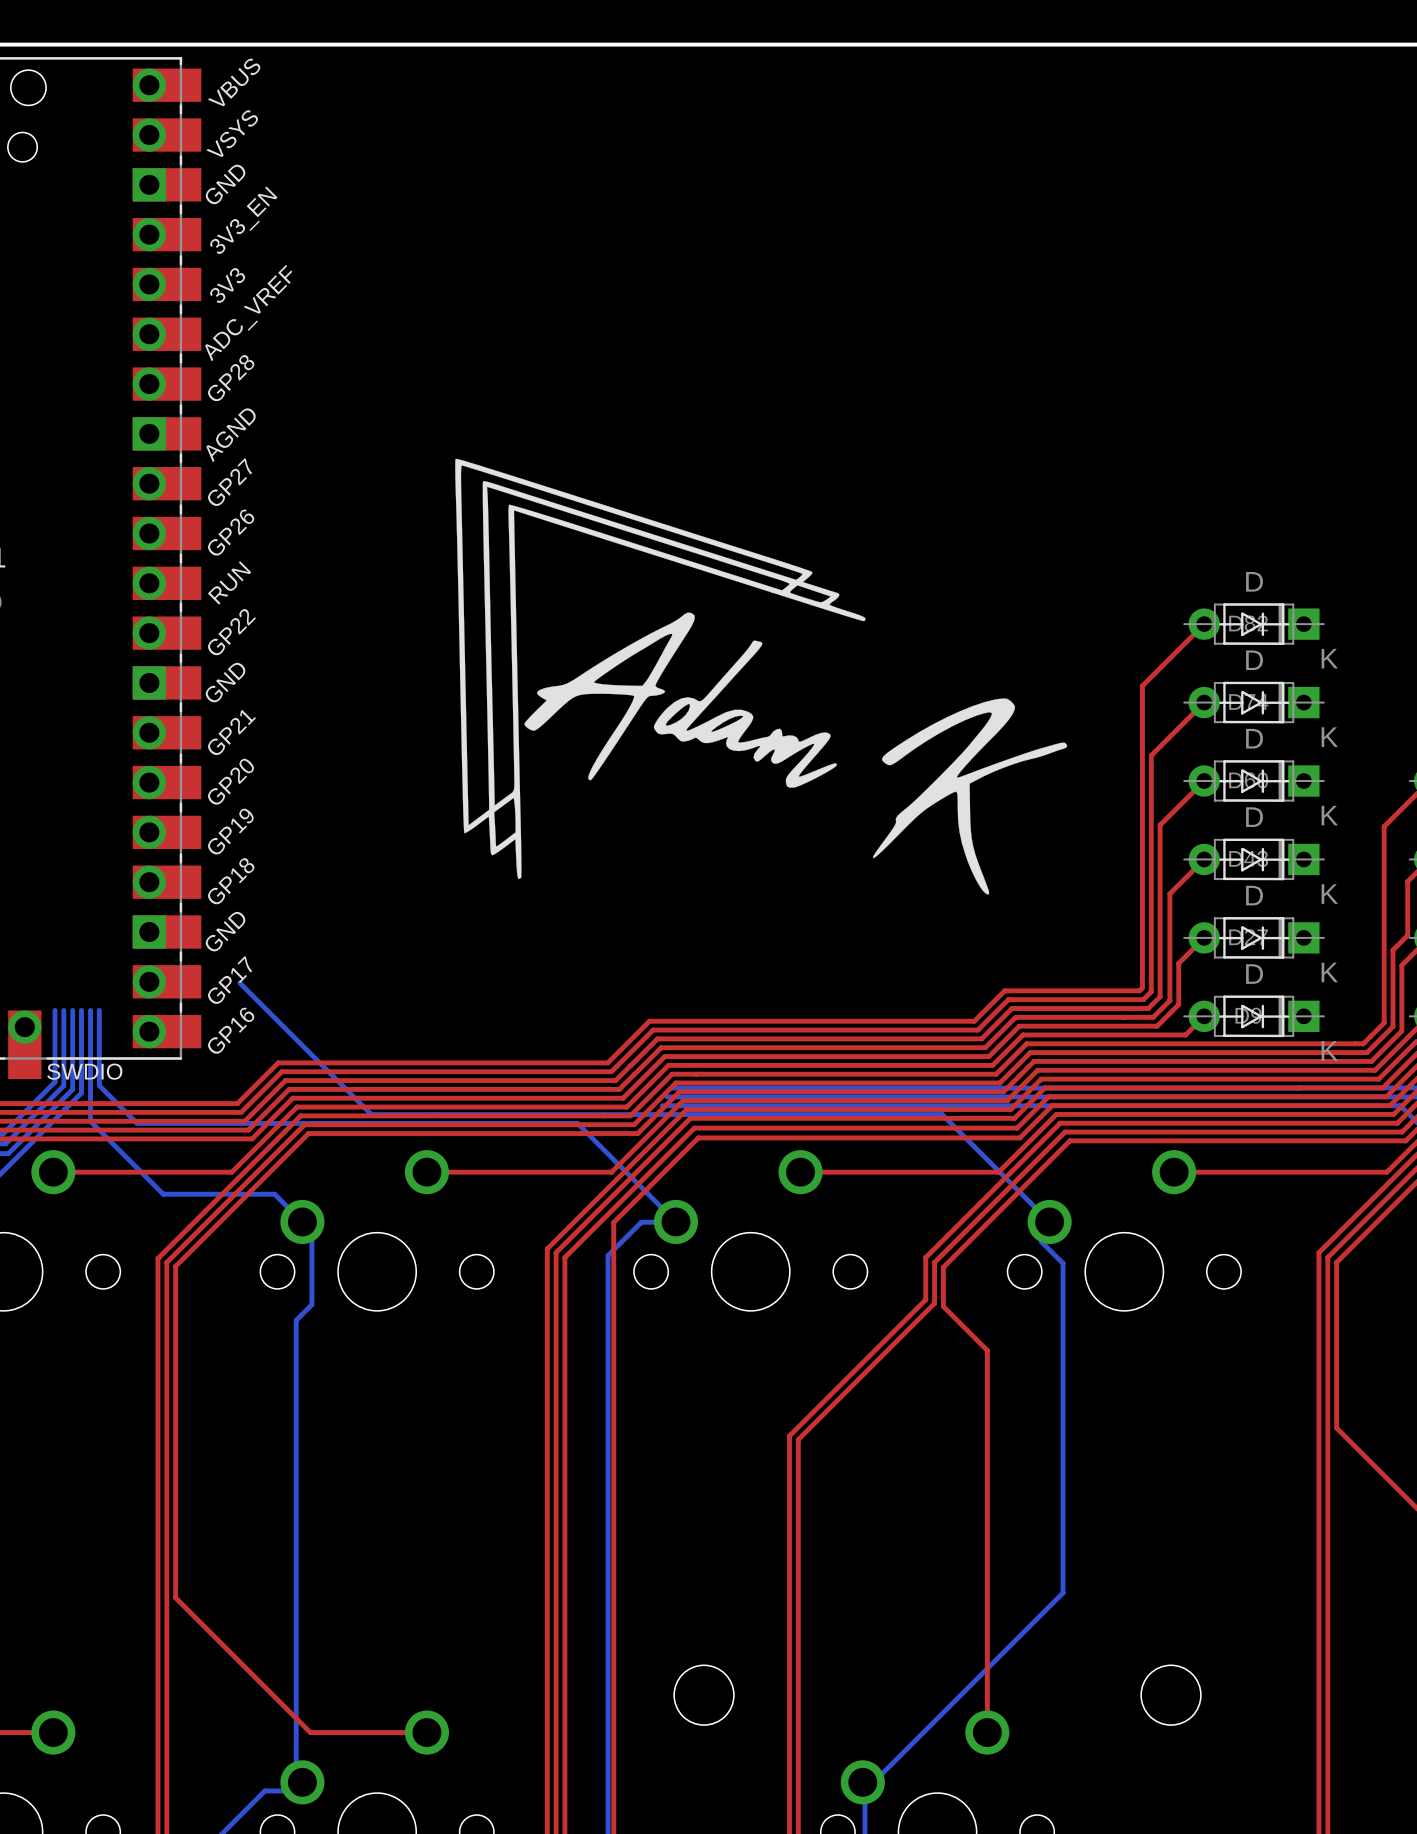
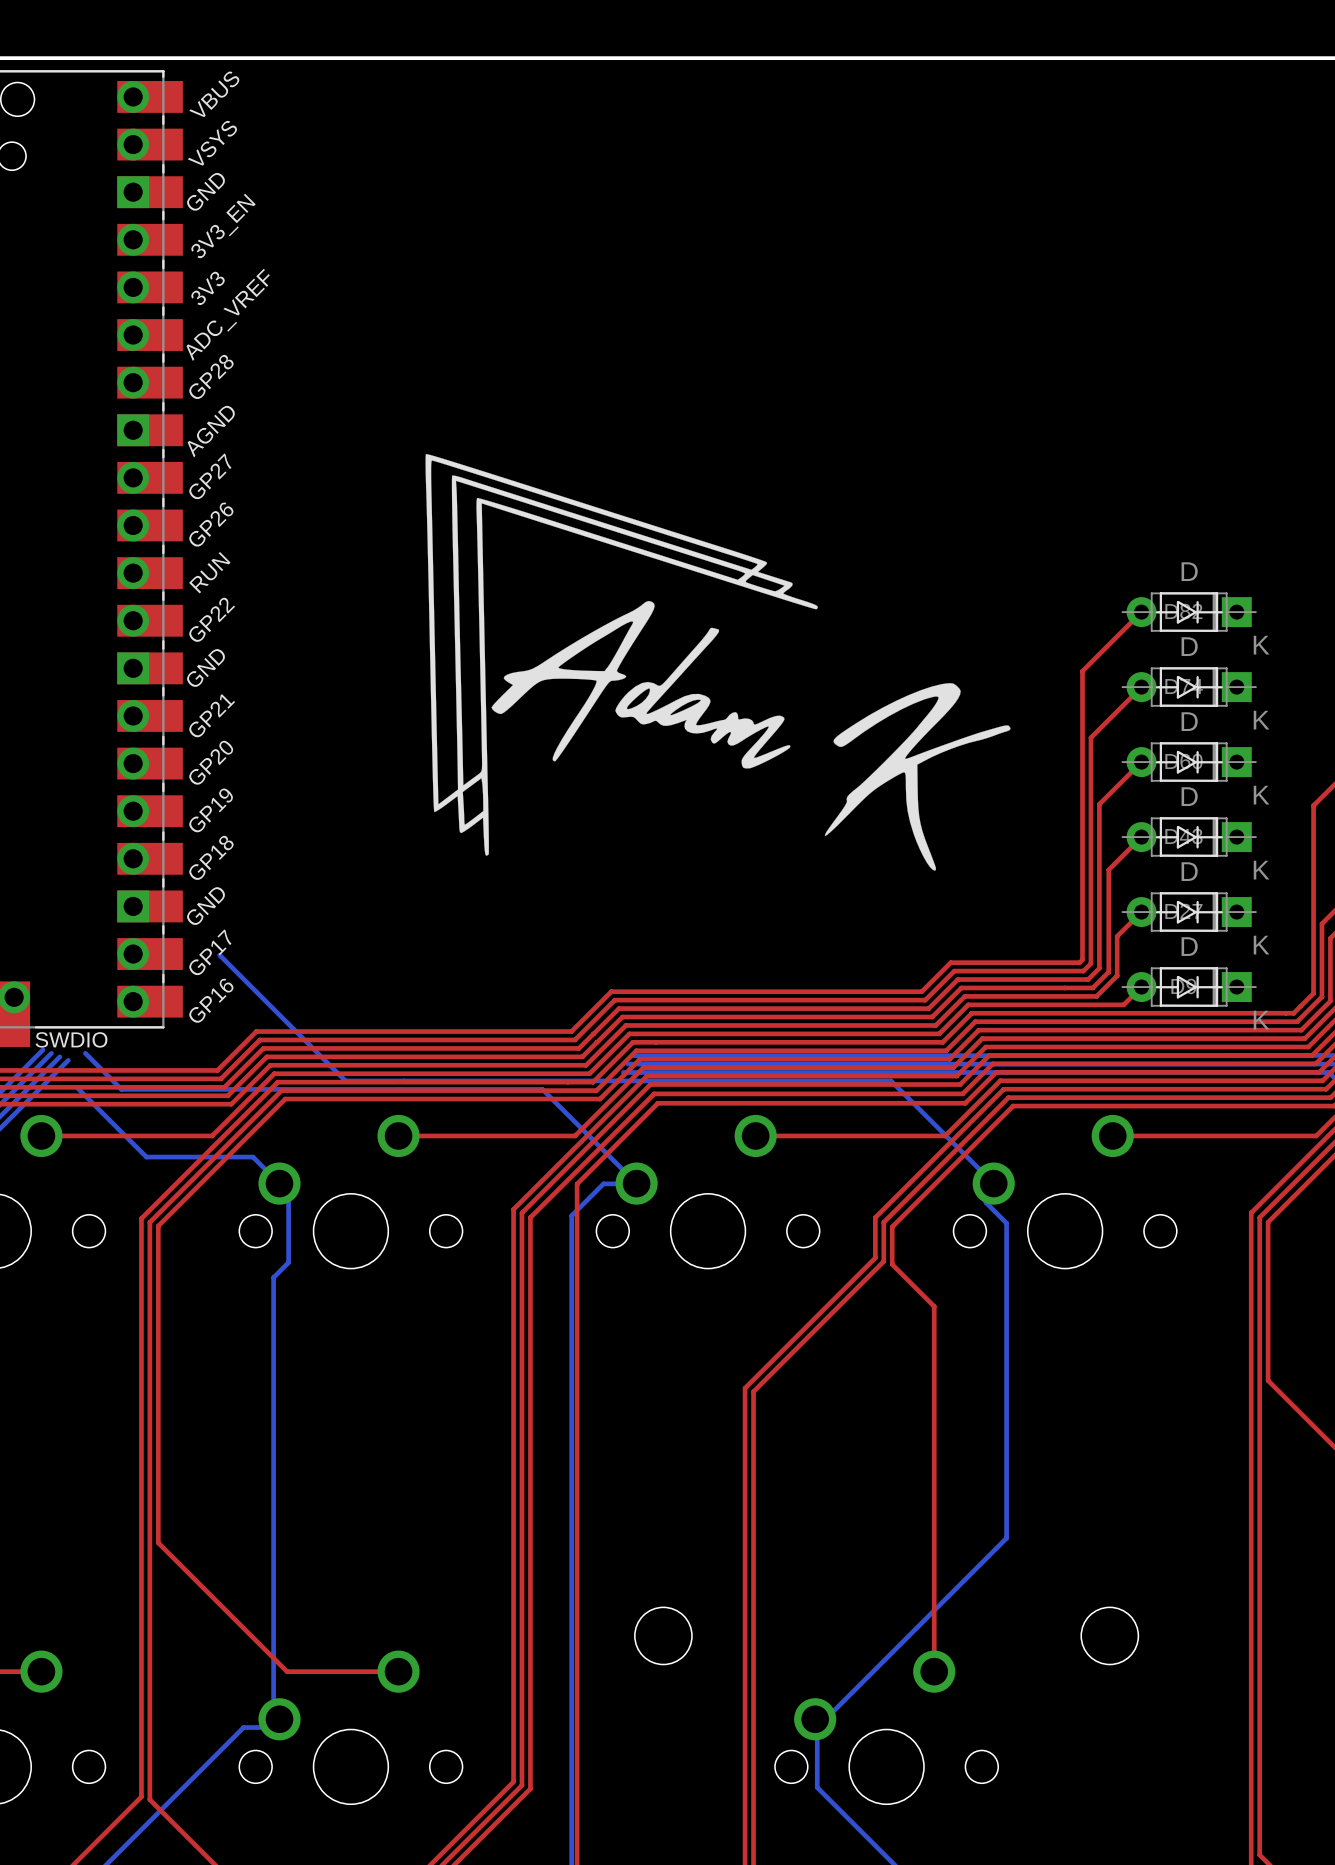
bottom track: (55, 1010) (55, 1082) -> none
bottom track: (63, 1010) (63, 1085) -> none
bottom track: (72, 1010) (72, 1089) -> none
bottom track: (81, 1010) (81, 1093) -> none
bottom track: (90, 1010) (90, 1121) -> none
bottom track: (99, 1010) (99, 1085) -> none

